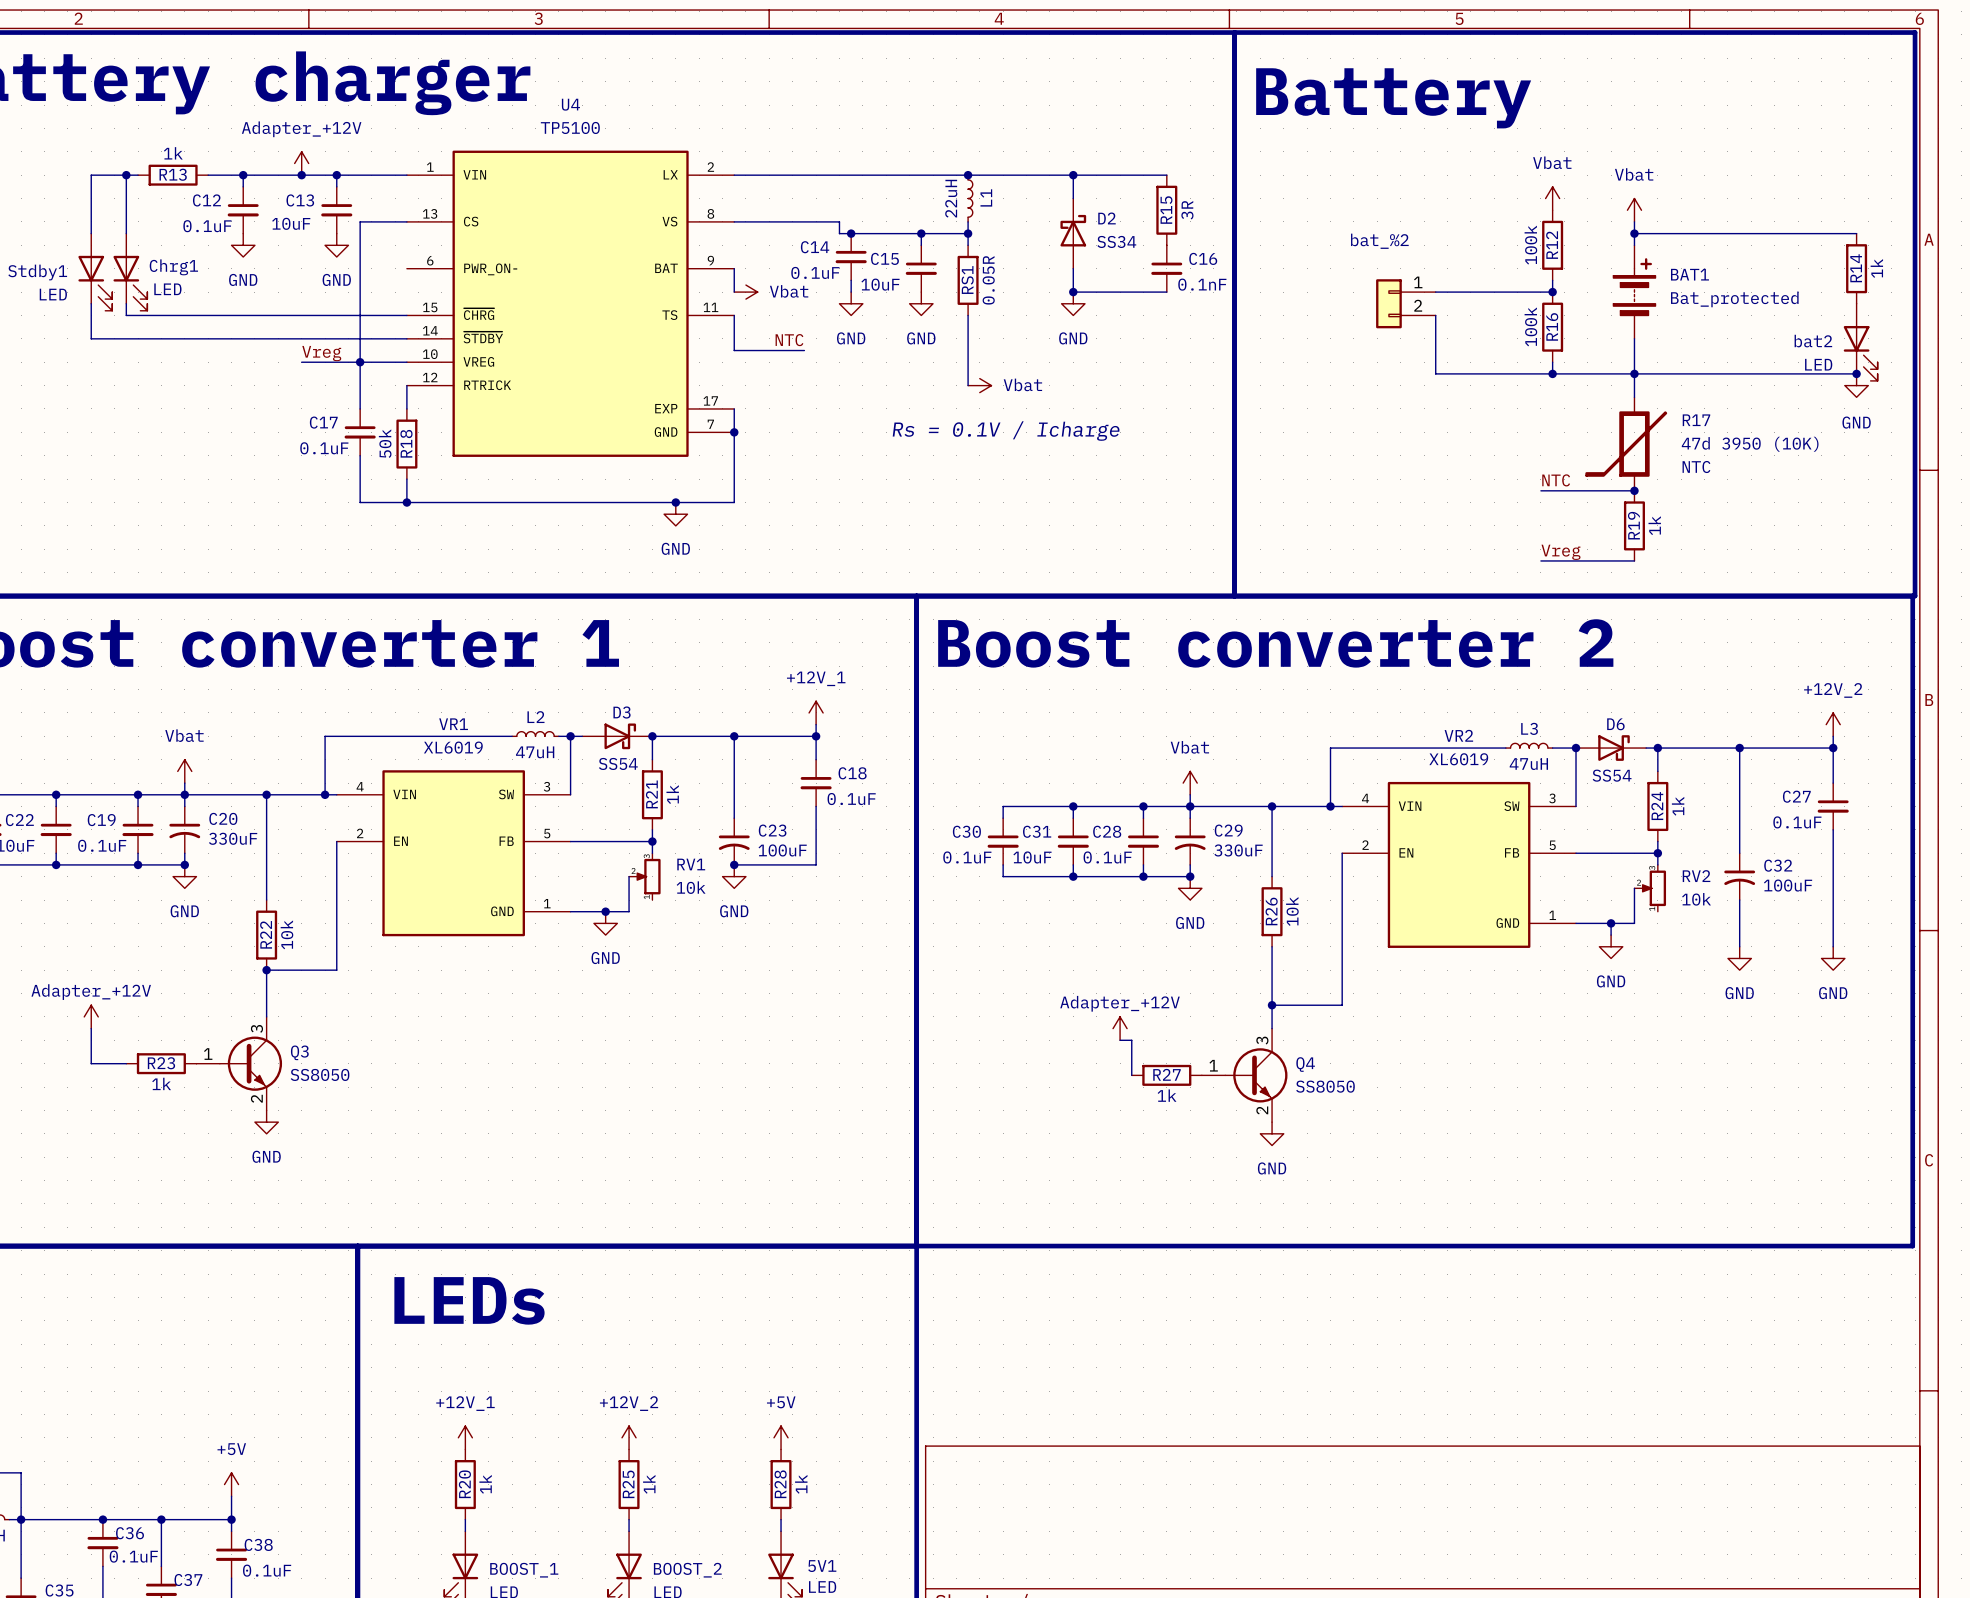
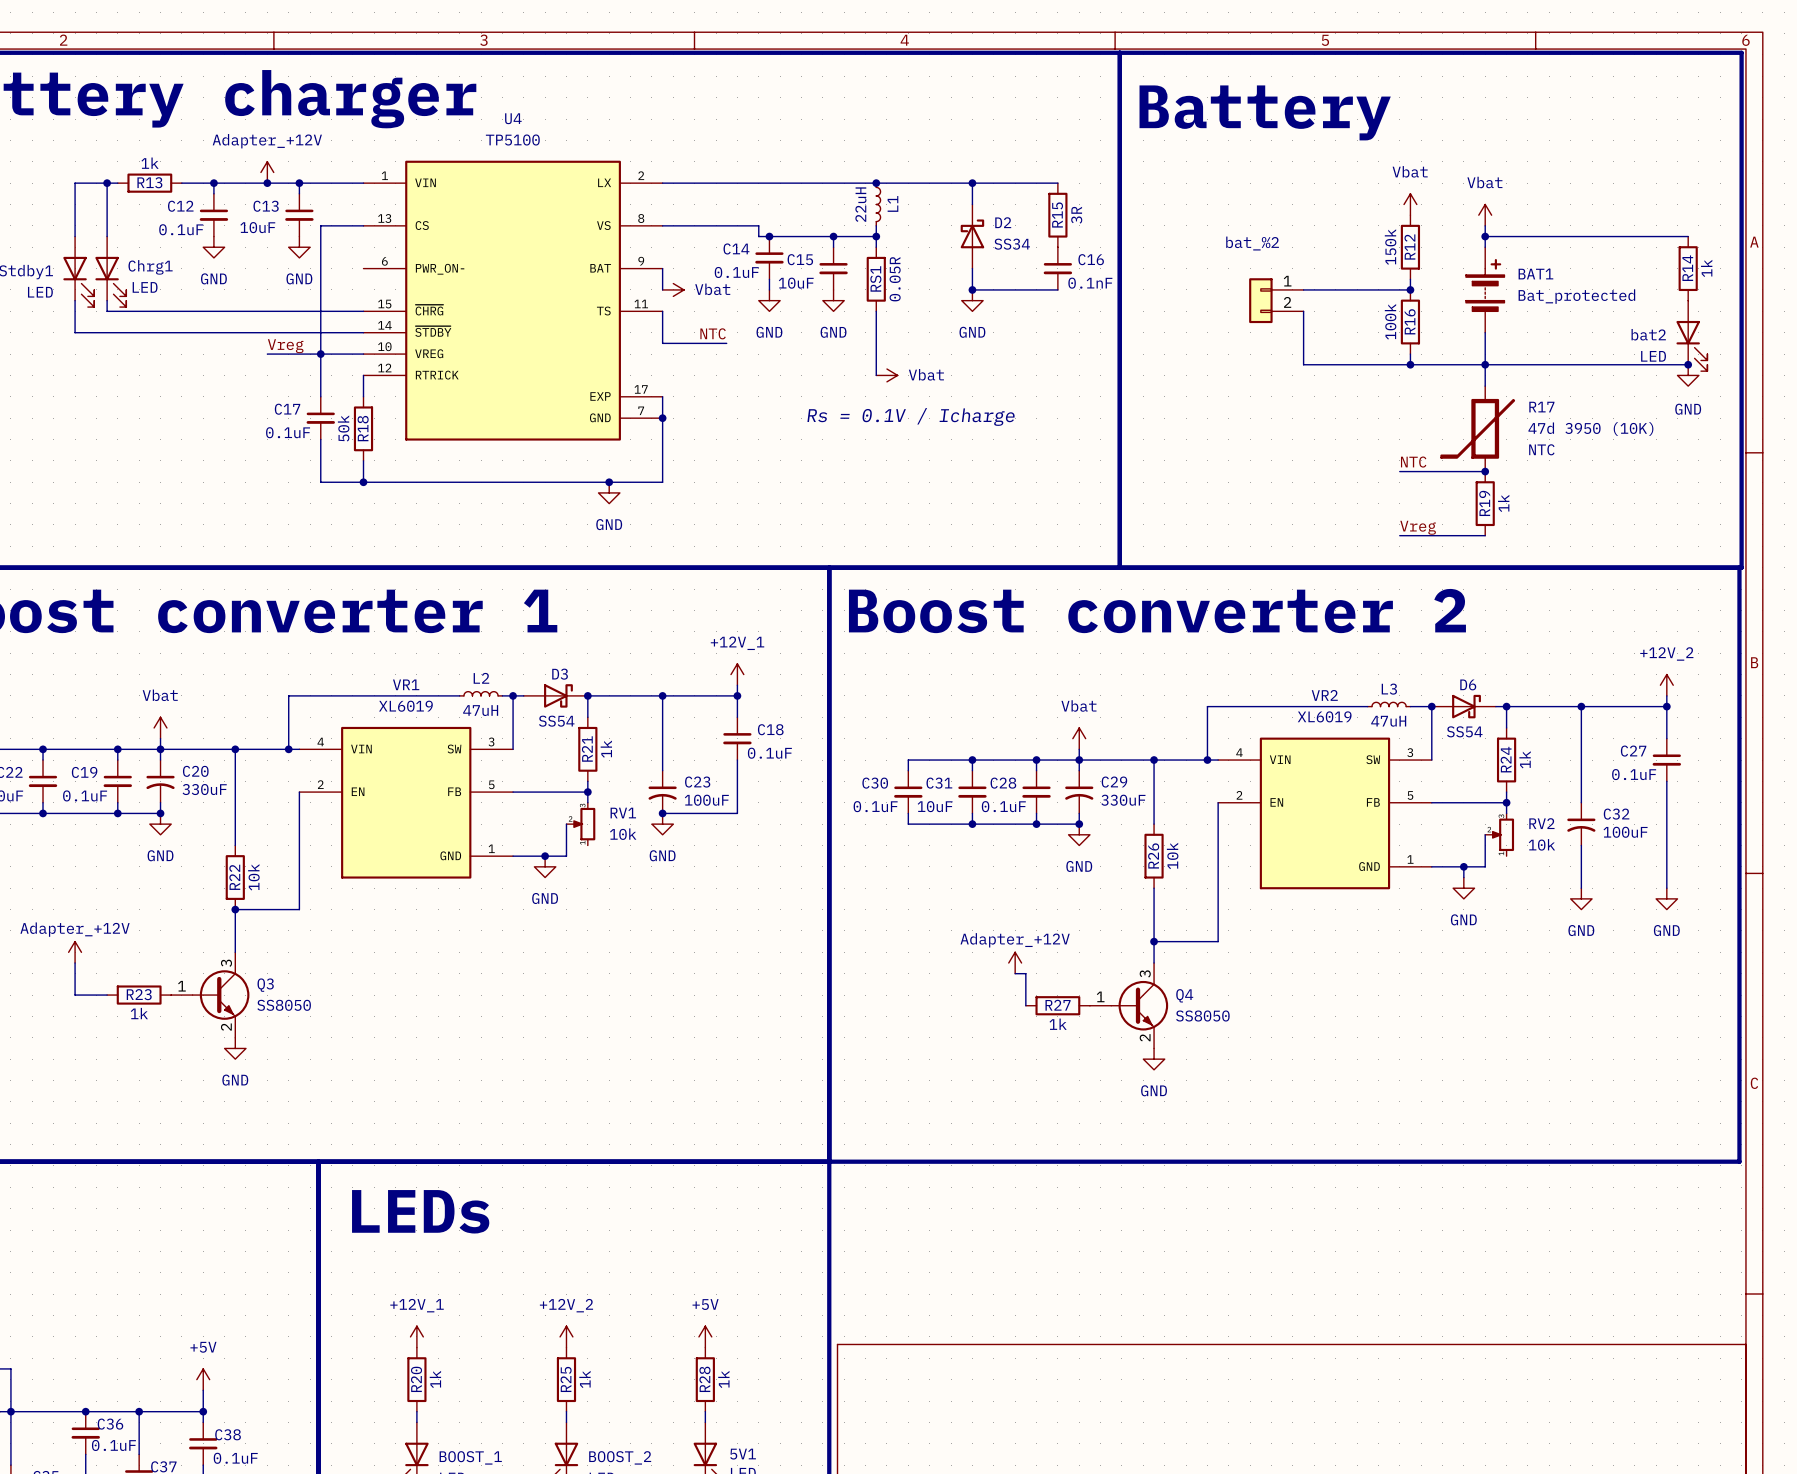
R12 value: 100k (1530, 245) -> 150k (1390, 247)

